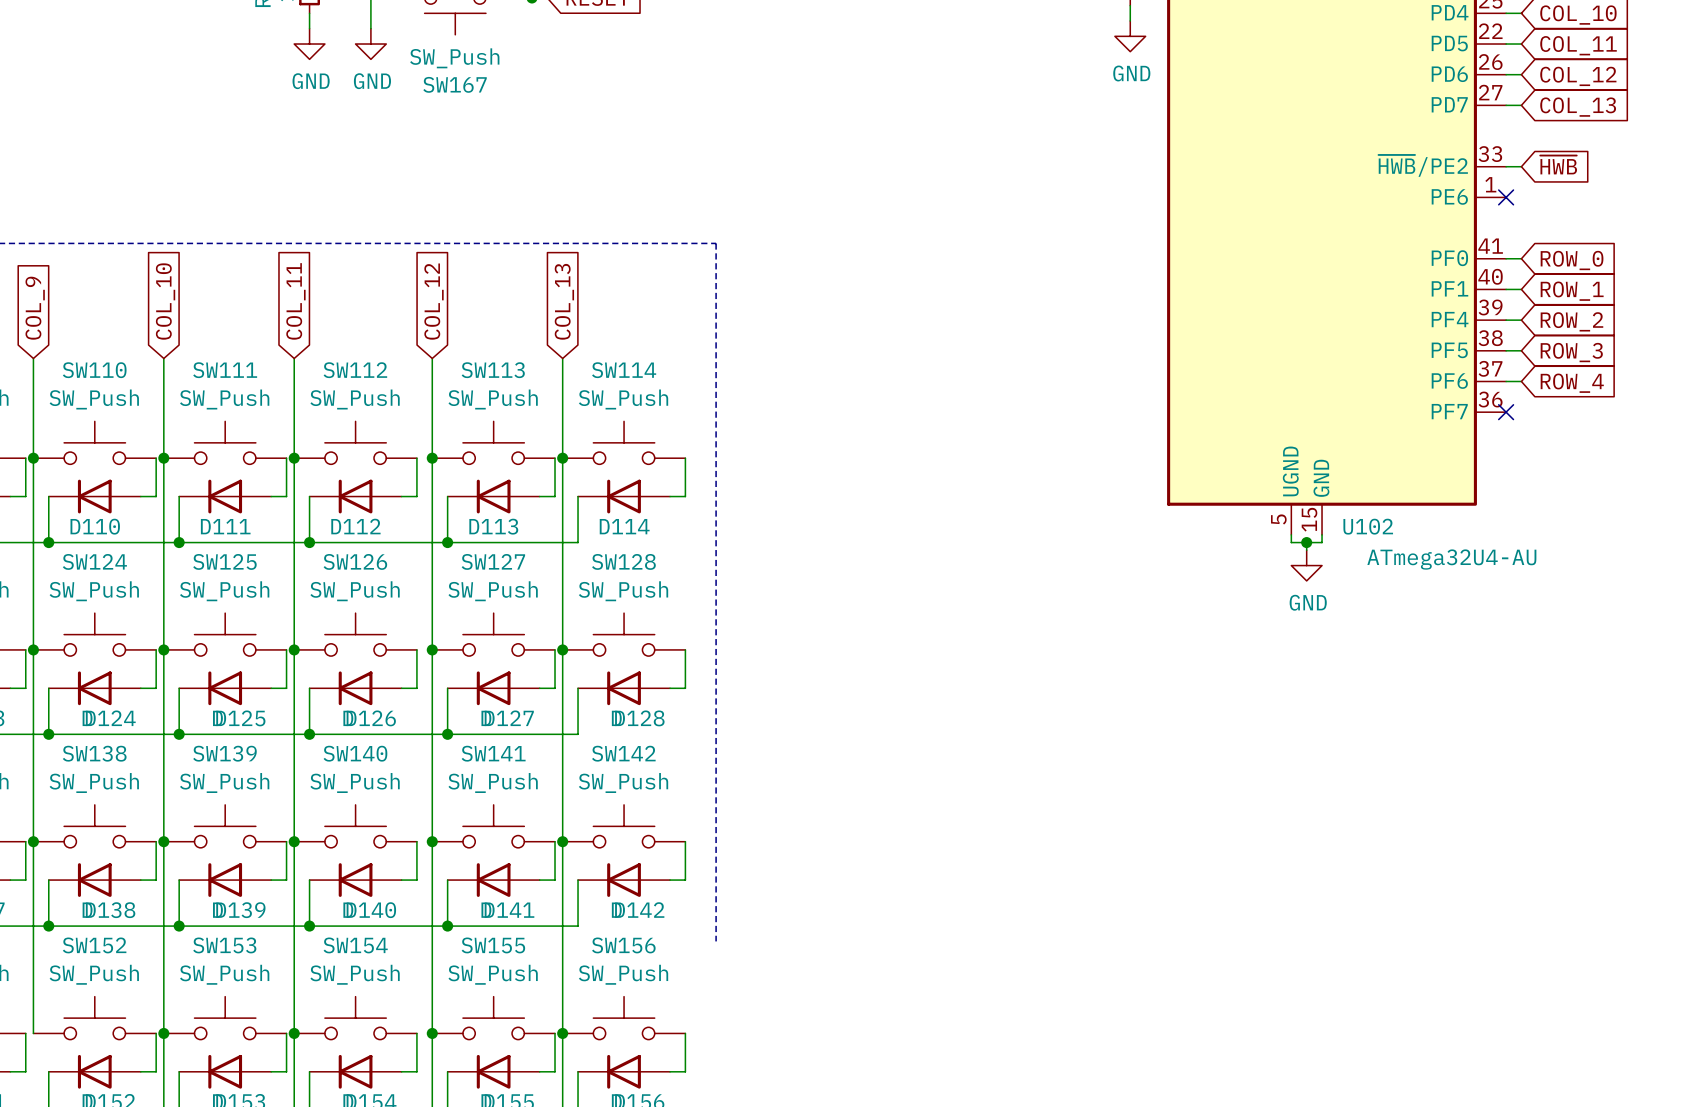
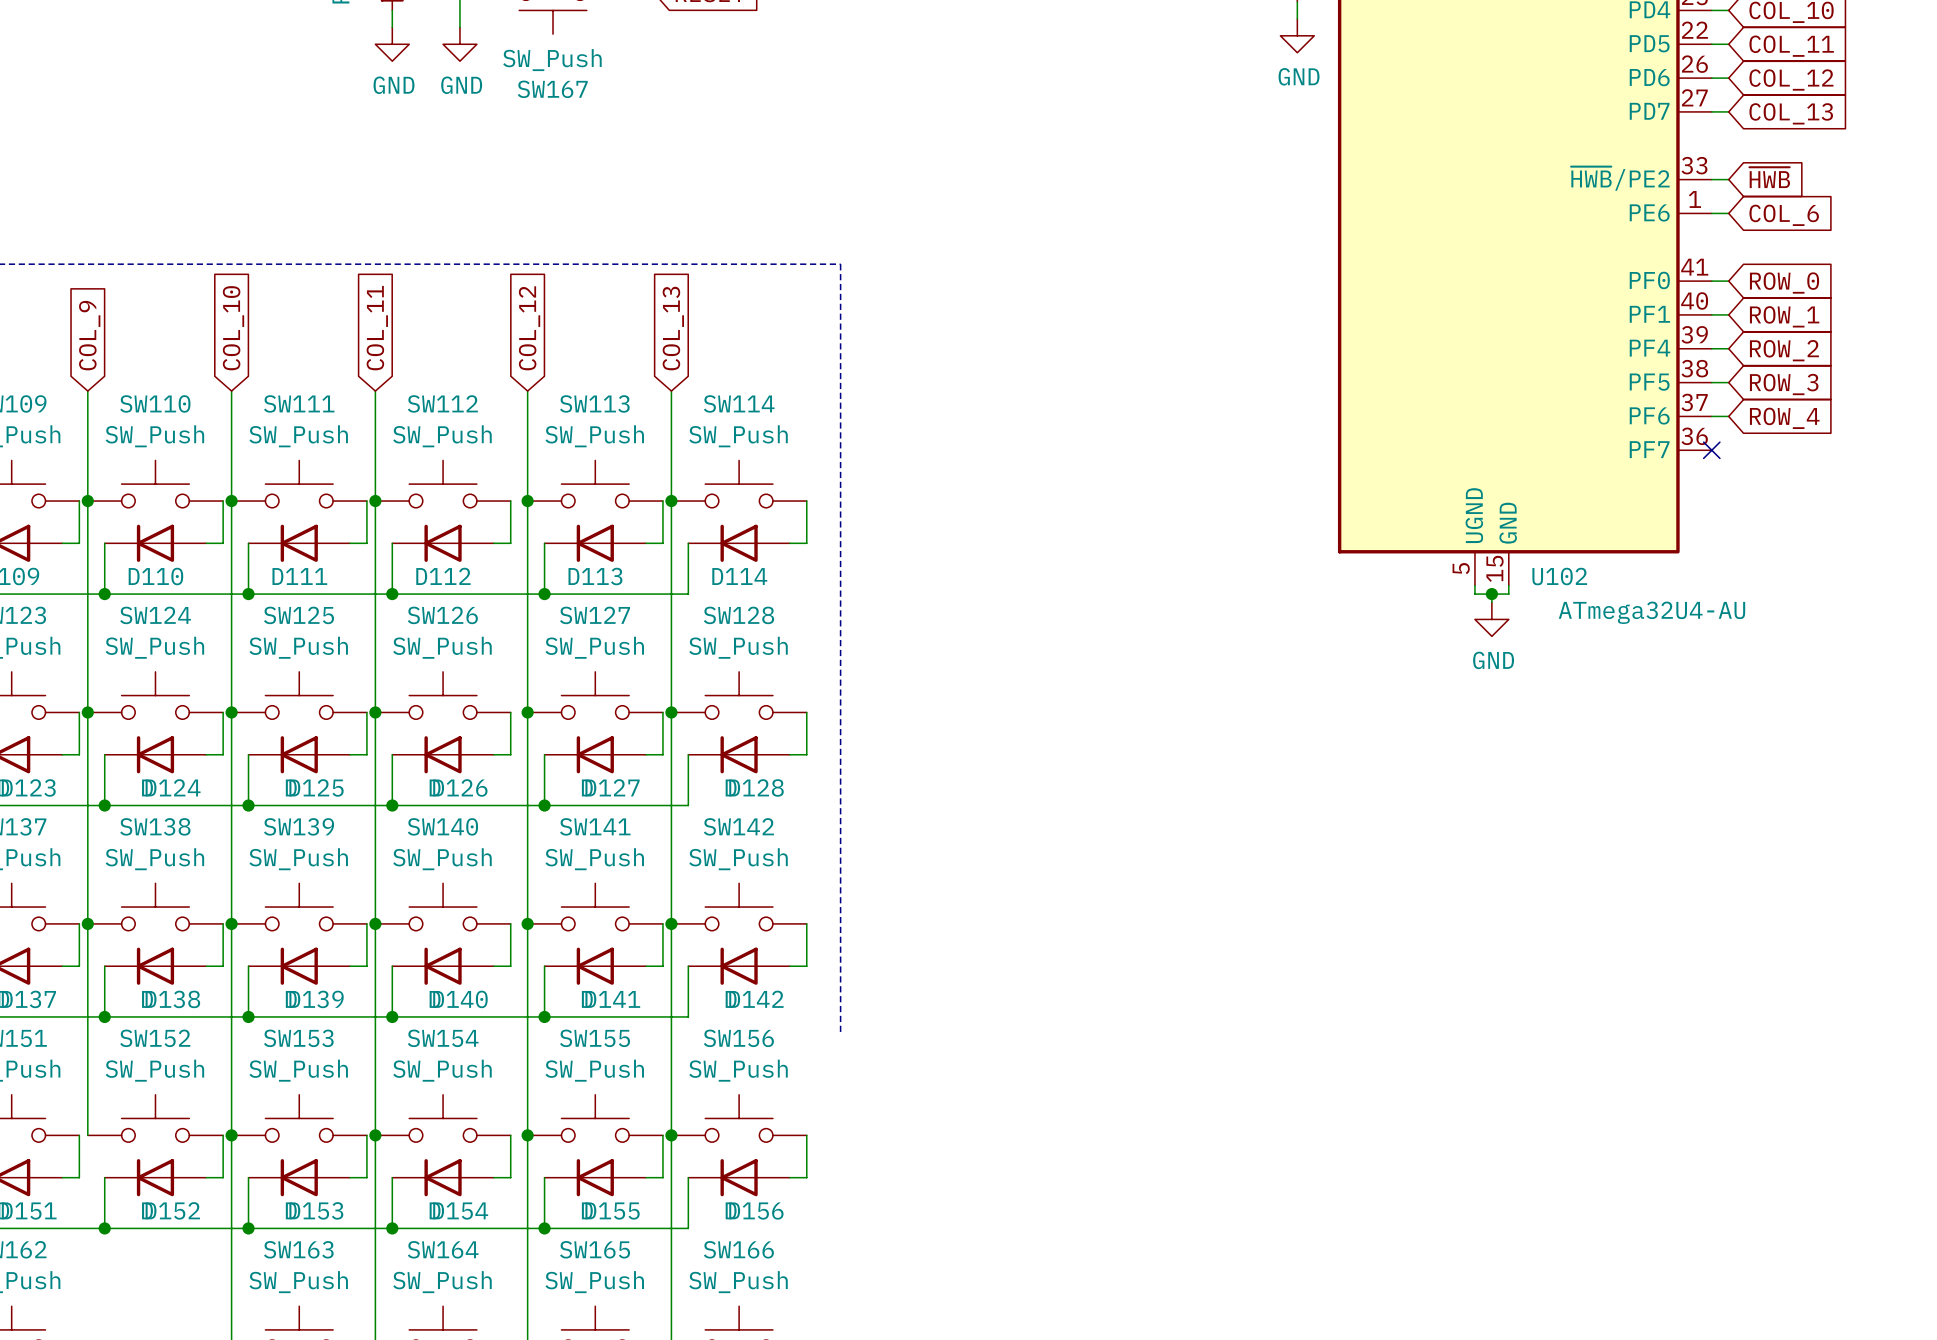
wire: none -> (1711, 213) (1728, 213)
no-connect mark: (1506, 197) -> none
global label: none -> COL_6 (1784, 215)

